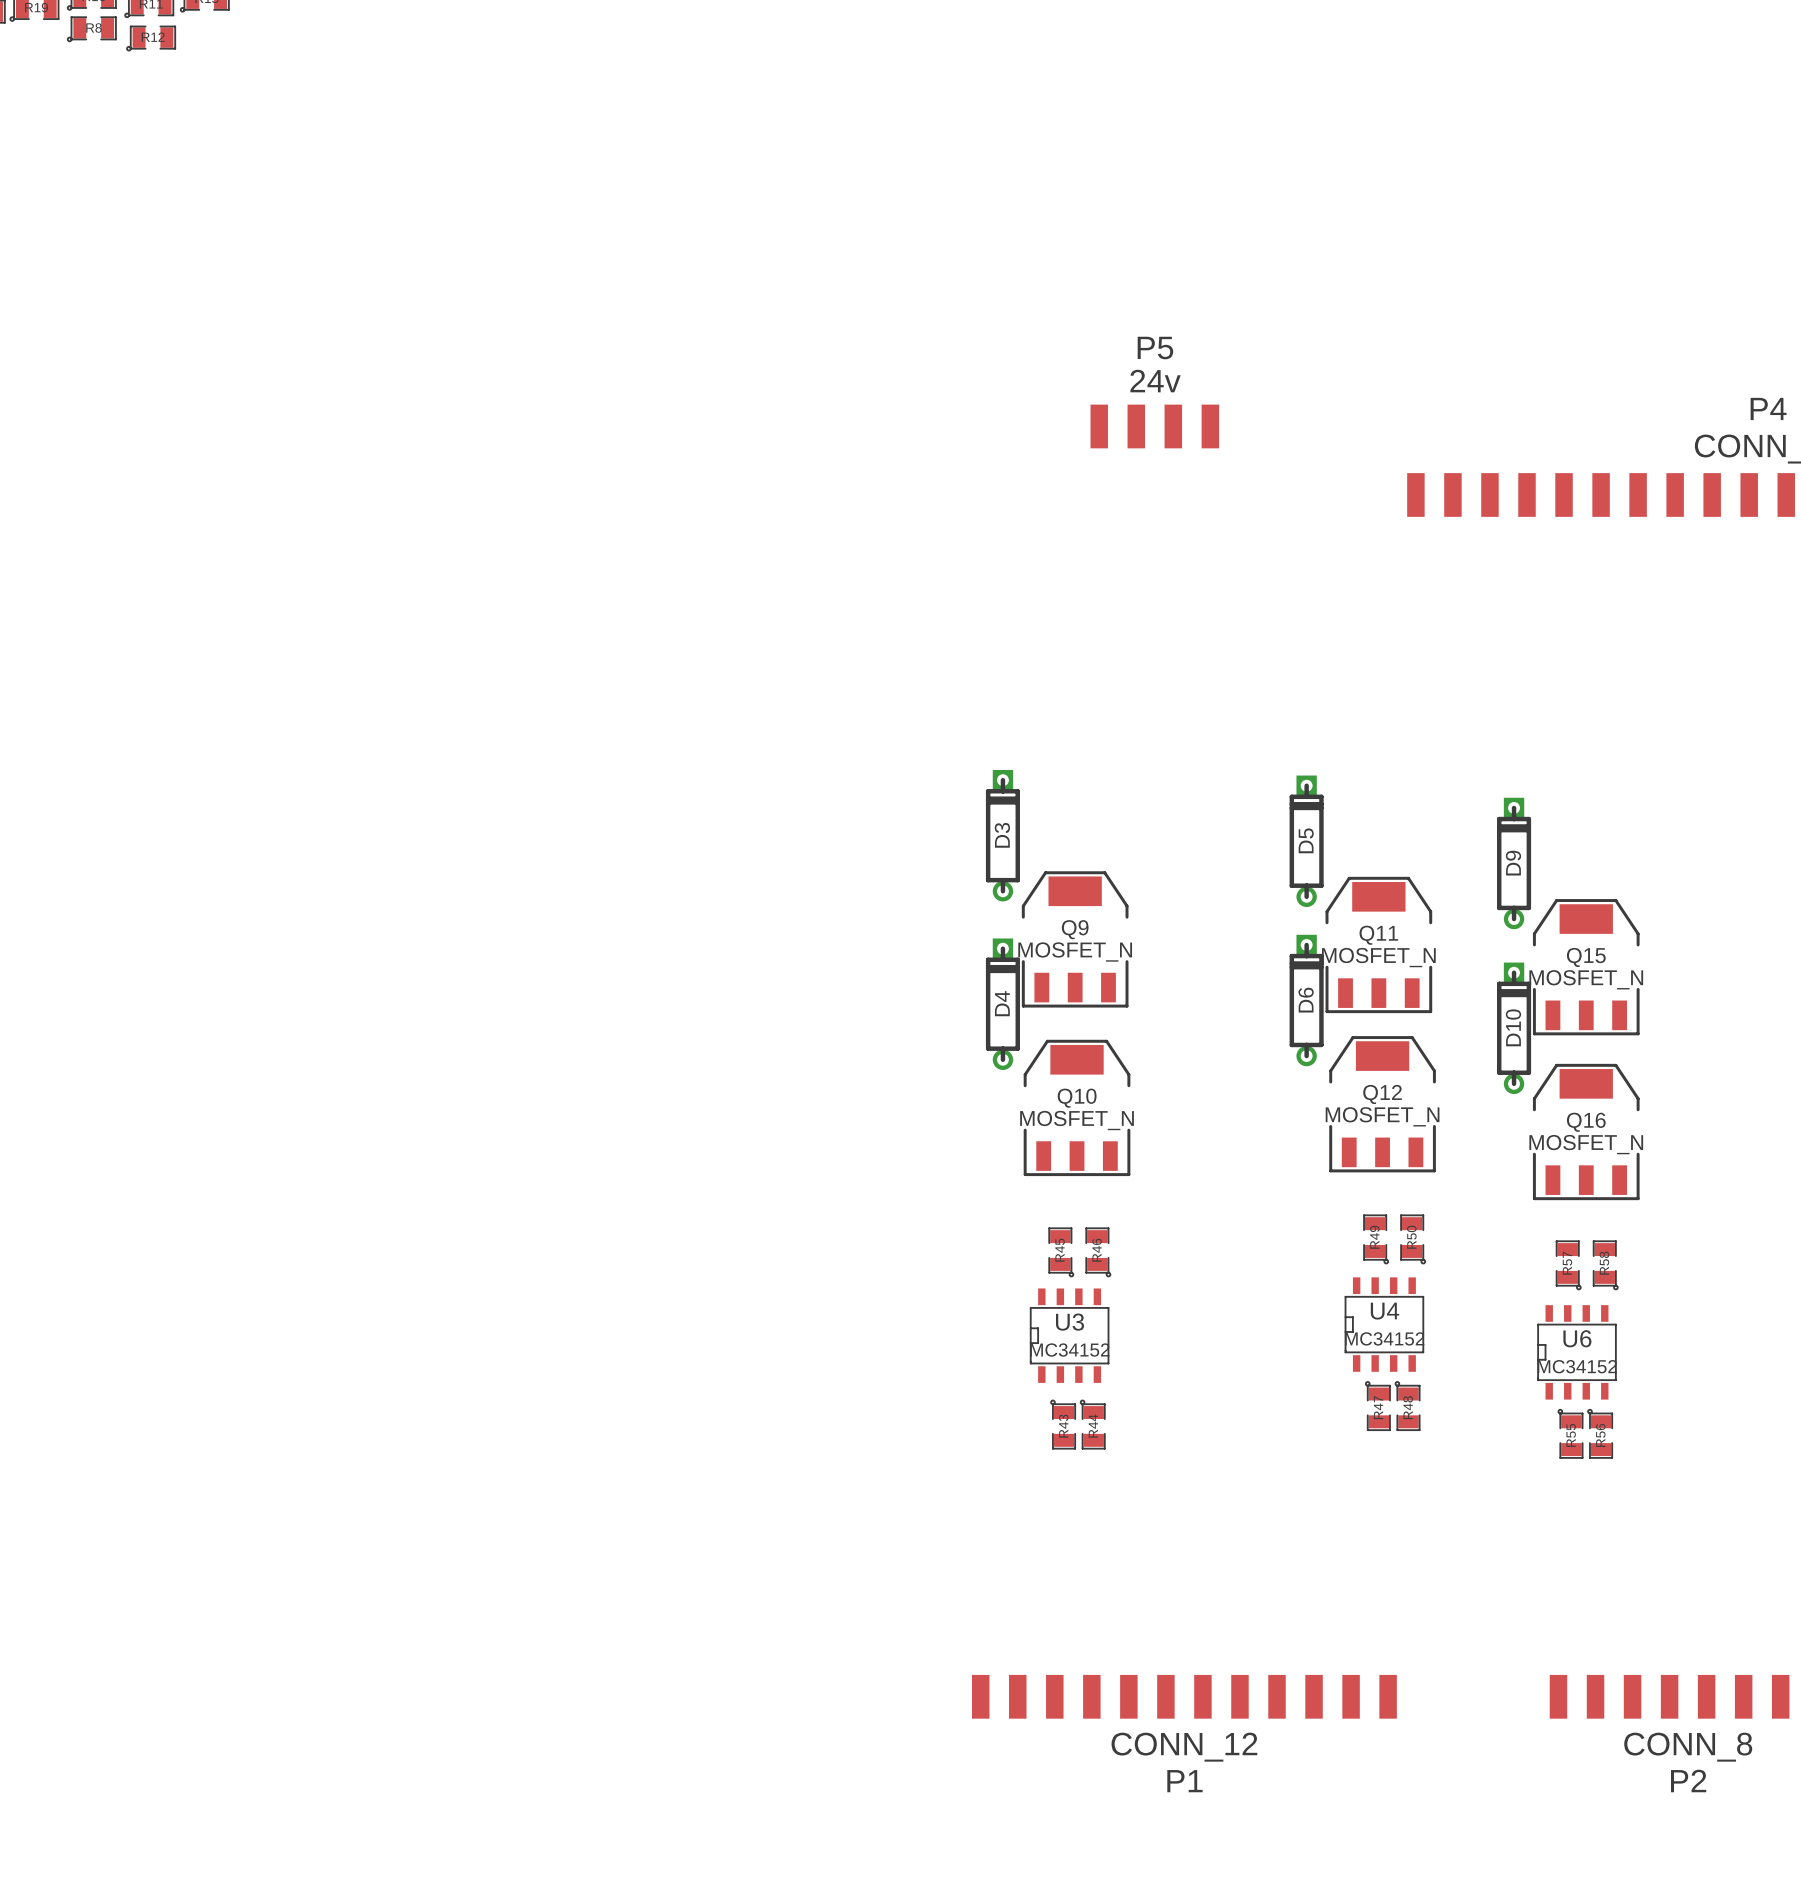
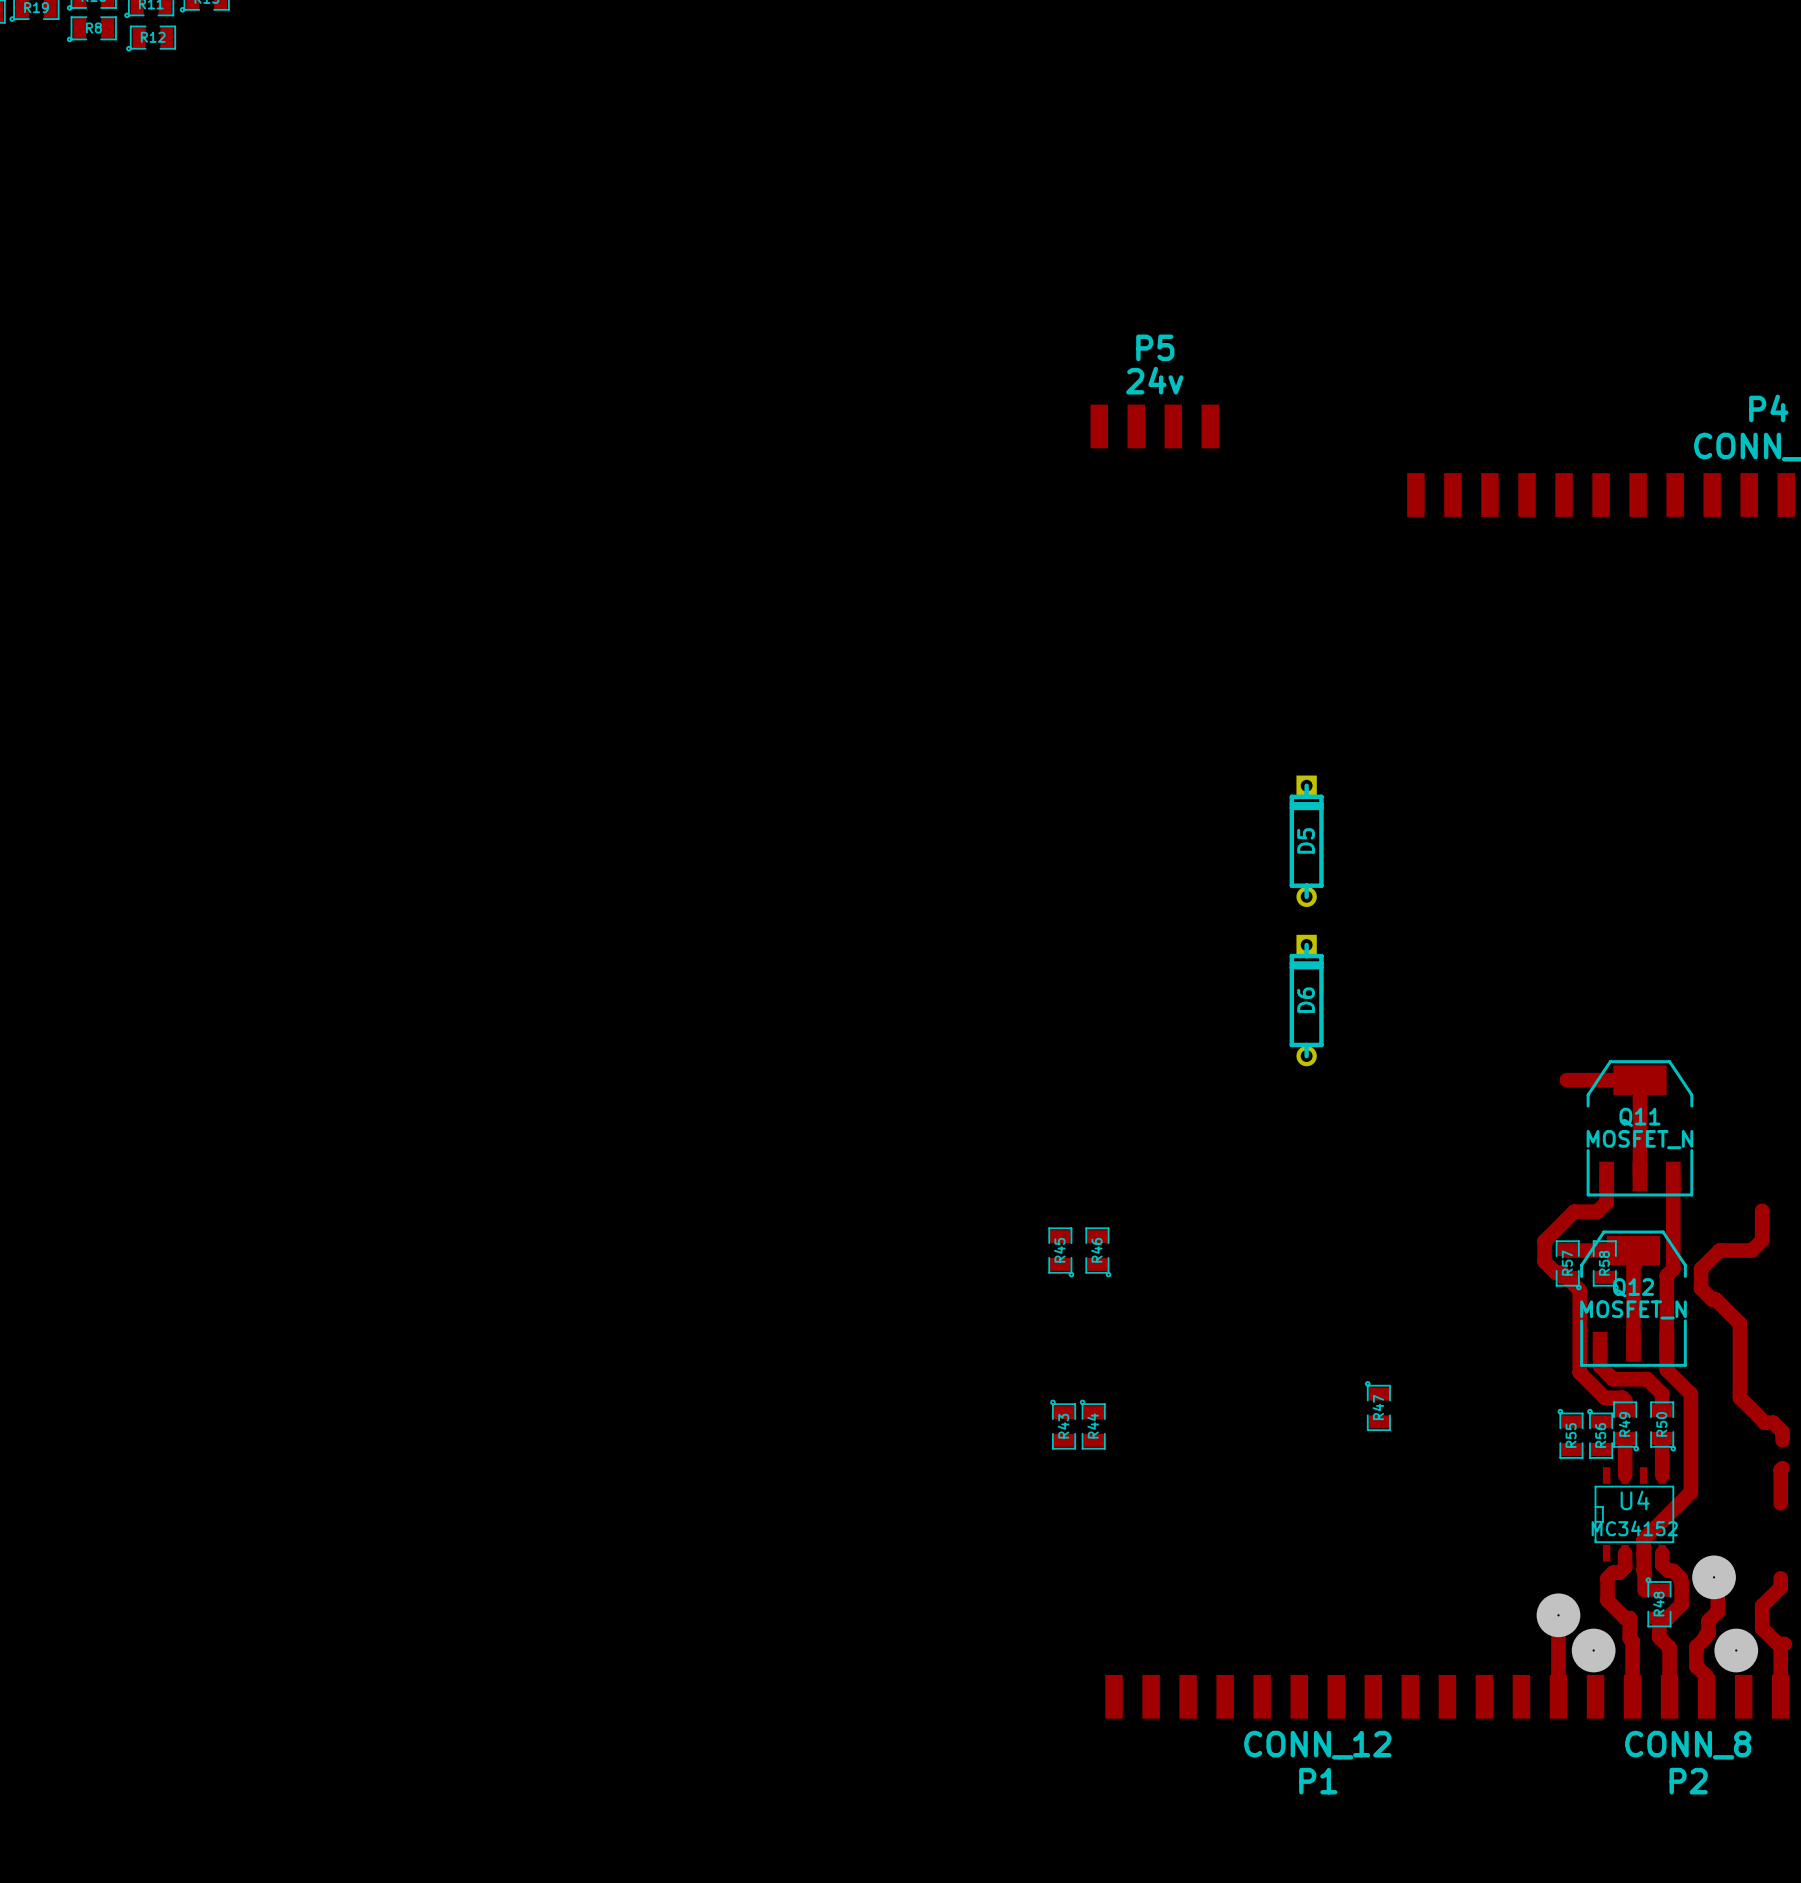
D3: (1002, 835) -> none
D9: (1514, 863) -> none
Q9: MOSFET_N (1075, 939) -> none
Q11 position: (1378, 944) -> (1639, 1128)
Q15: MOSFET_N (1586, 967) -> none
D4: (1002, 1004) -> none
D10: (1514, 1028) -> none
track: none -> (1566, 1080) (1639, 1080) (1639, 1176)
Q12 position: (1382, 1104) -> (1633, 1298)
Q10: MOSFET_N (1077, 1107) -> none
Q16: MOSFET_N (1586, 1132) -> none
track: none -> (1606, 1176) (1606, 1202) (1597, 1211) (1574, 1211) (1544, 1241) (1544, 1261) (1555, 1272) (1562, 1272) (1579, 1290) (1579, 1372) (1604, 1397) (1622, 1397) (1625, 1400) (1625, 1410)
track: none -> (1673, 1176) (1673, 1269) (1666, 1275) (1666, 1369) (1690, 1394) (1690, 1492) (1643, 1539) (1644, 1590)
track: none -> (1762, 1210) (1762, 1240) (1751, 1250) (1719, 1250) (1701, 1269) (1701, 1288) (1712, 1299) (1715, 1299) (1739, 1323) (1739, 1397) (1764, 1422) (1773, 1422) (1782, 1431) (1782, 1440)
R49 position: (1376, 1239) -> (1626, 1426)
R50 position: (1413, 1239) -> (1663, 1426)
track: none -> (1566, 1250) (1633, 1250) (1633, 1346)
U4 position: (1384, 1324) -> (1634, 1514)
U3: MC34152 (1069, 1335) -> none
track: none -> (1600, 1346) (1600, 1366) (1613, 1379) (1647, 1379) (1662, 1394) (1662, 1410)
U6: MC34152 (1577, 1352) -> none
R48 position: (1407, 1406) -> (1658, 1602)
track: none -> (1625, 1438) (1625, 1475)
track: none -> (1662, 1438) (1662, 1475)
track: none -> (1782, 1468) (1780, 1469) (1780, 1503)
track: none -> (1625, 1553) (1625, 1567) (1619, 1572) (1613, 1572) (1607, 1578) (1607, 1600) (1625, 1618) (1629, 1618) (1629, 1638) (1632, 1641) (1632, 1696)
track: none -> (1662, 1553) (1662, 1564) (1668, 1570) (1673, 1570) (1681, 1581) (1681, 1604) (1667, 1618) (1659, 1618) (1659, 1637) (1669, 1647) (1669, 1696)
track: none -> (1714, 1577) (1717, 1581) (1717, 1611) (1708, 1620) (1708, 1632) (1705, 1637) (1696, 1646) (1696, 1666) (1706, 1676) (1706, 1696)
via: none -> (1714, 1577)
track: none -> (1780, 1578) (1780, 1587) (1762, 1606) (1762, 1628) (1777, 1644) (1784, 1644) (1780, 1647) (1780, 1696)
track: none -> (1558, 1615) (1558, 1696)
via: none -> (1558, 1615)
via: none -> (1593, 1650)
via: none -> (1736, 1650)
P1 position: (1184, 1696) -> (1317, 1696)

